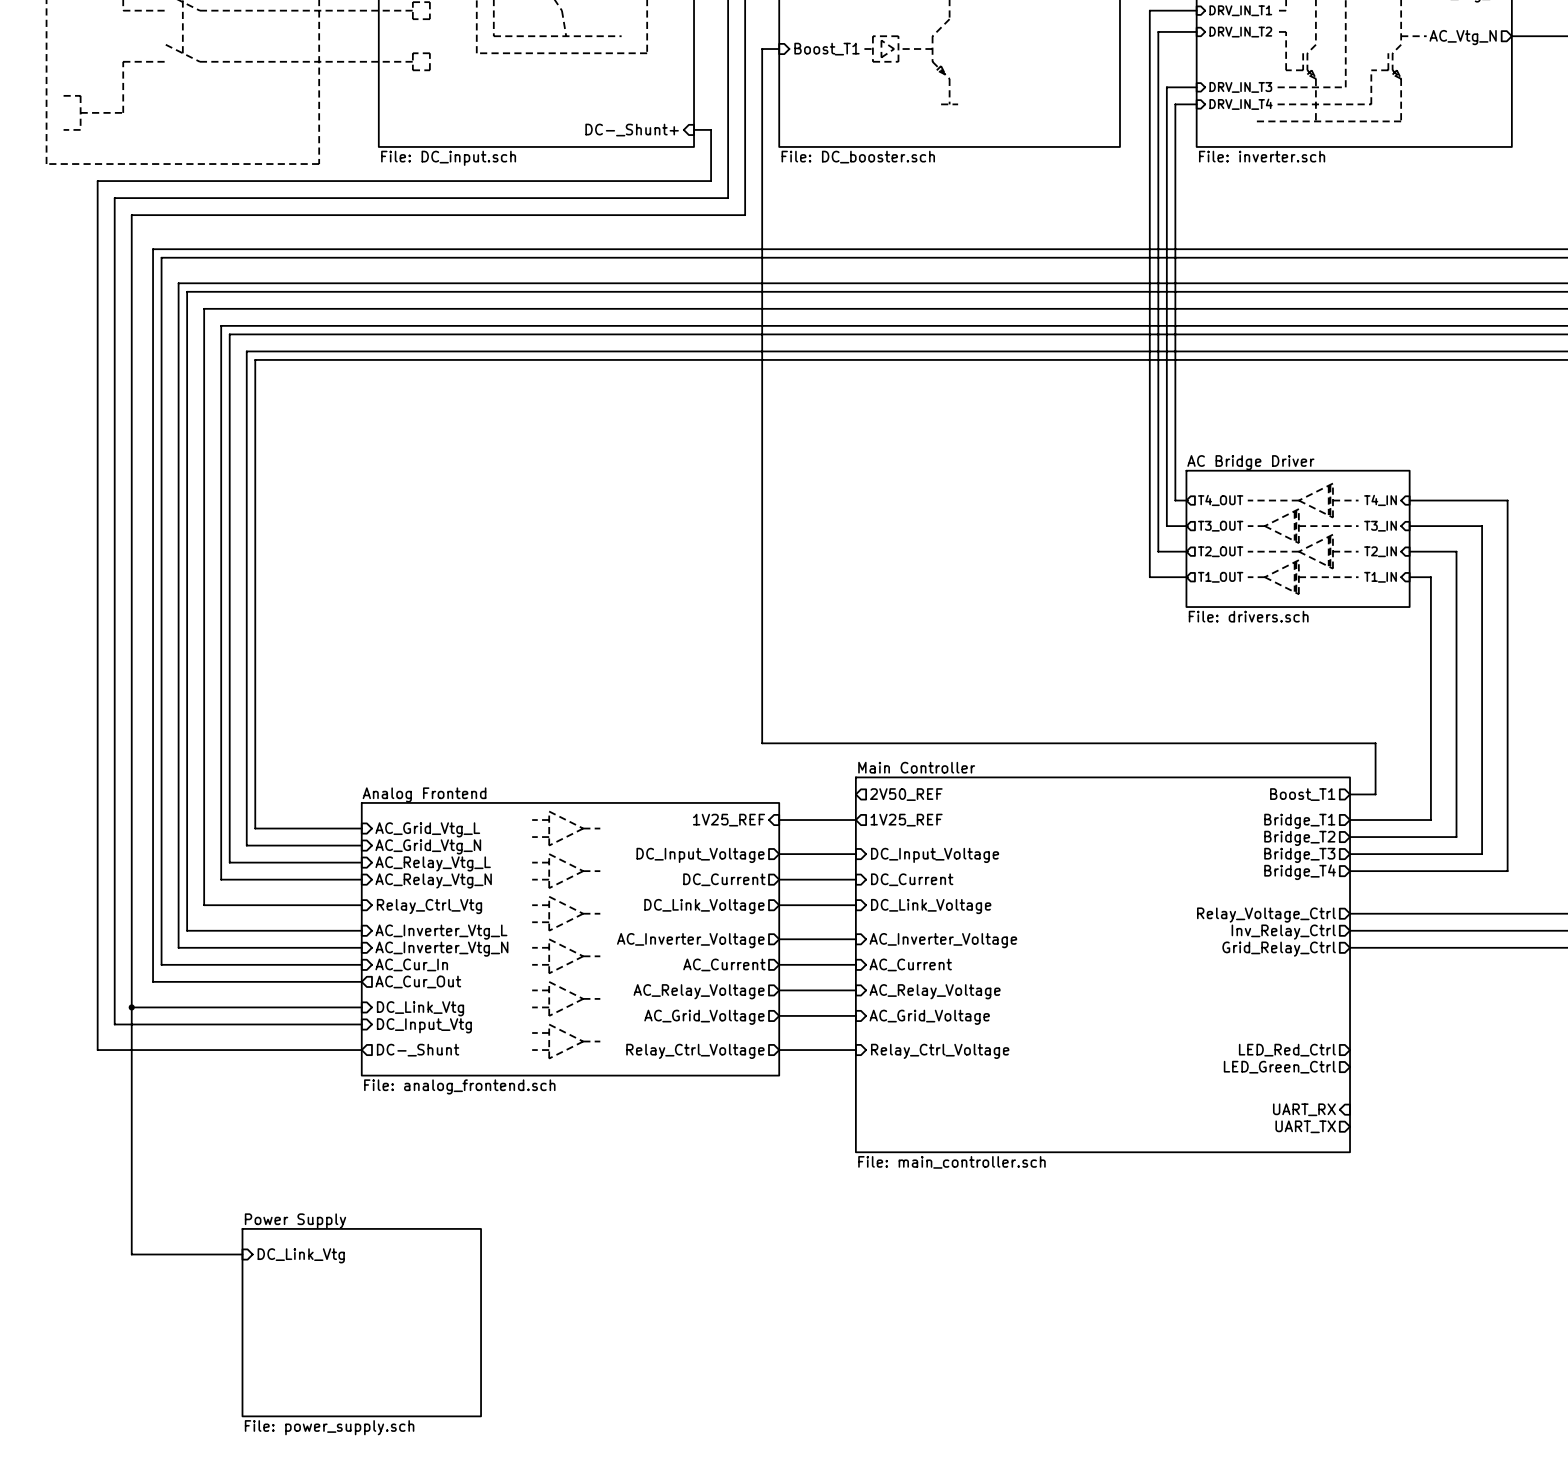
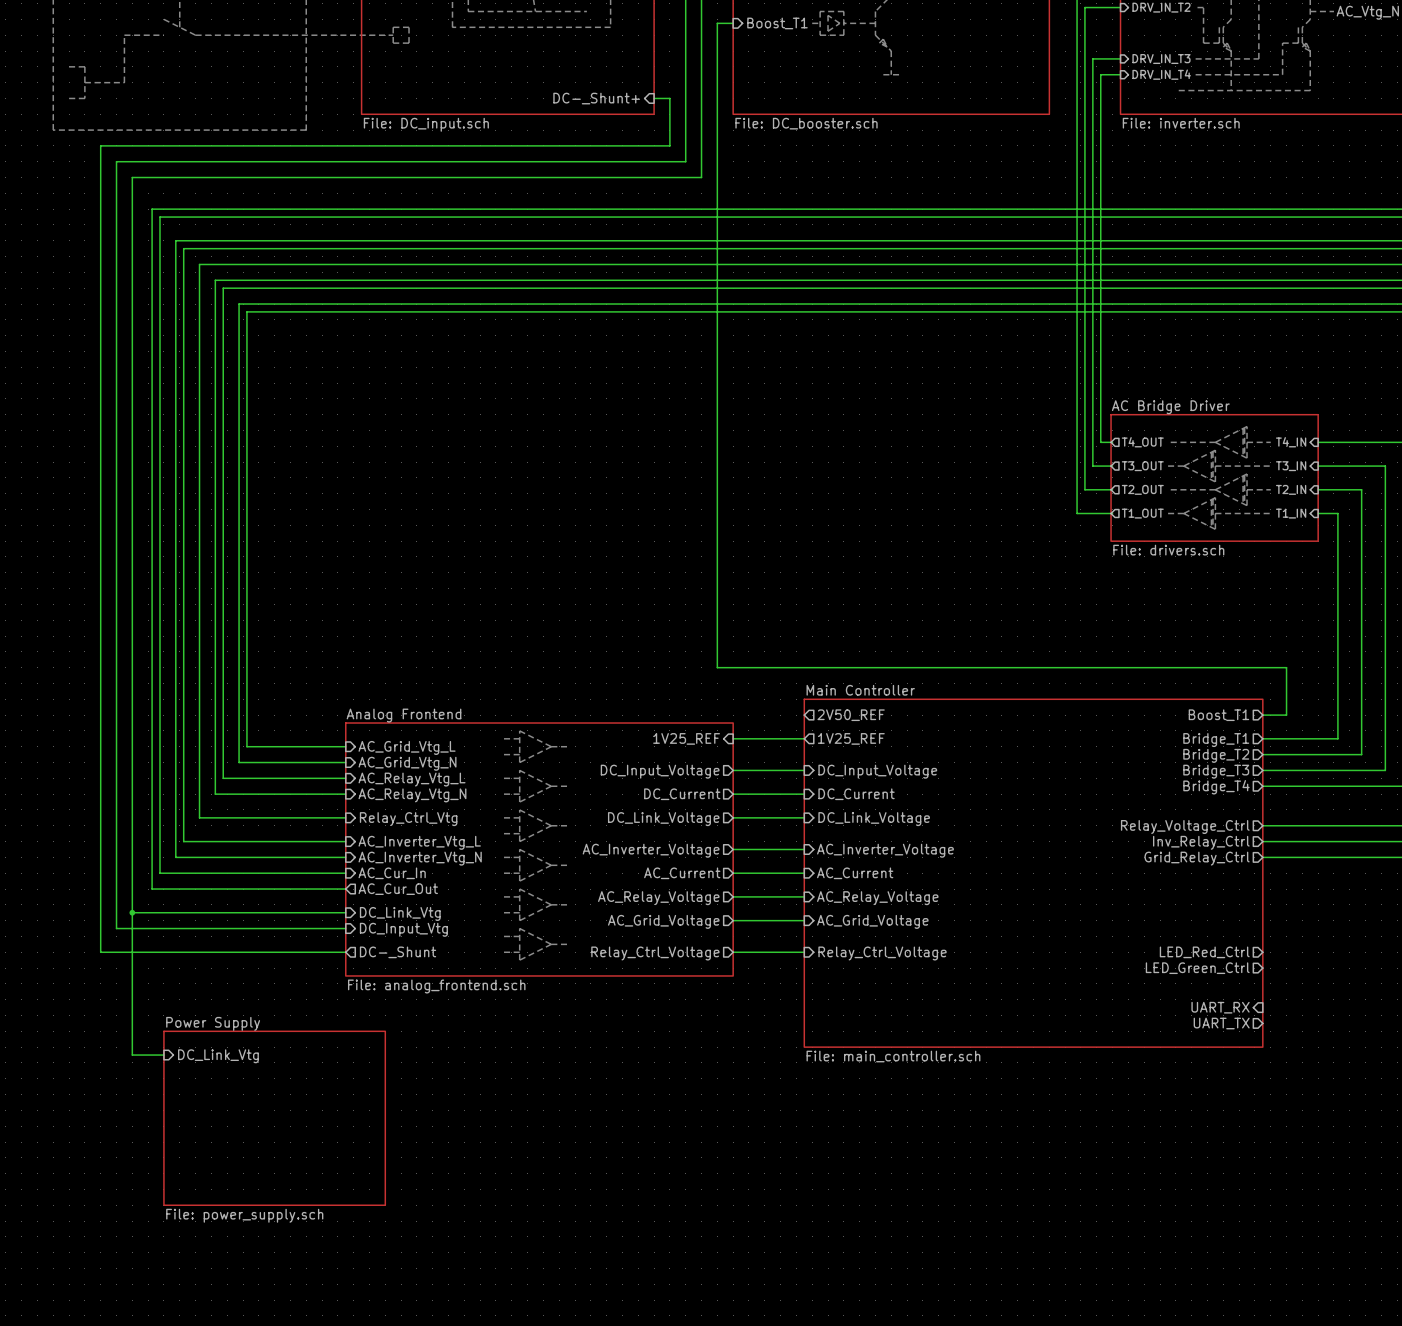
wire: (131, 1160) (131, 1254) (242, 1254) -> (132, 1055) (163, 1055)
sheet pin position: DC_Link_Vtg (301, 1255) -> DC_Link_Vtg (218, 1056)
sheet Power Supply position: (361, 1322) -> (274, 1118)

